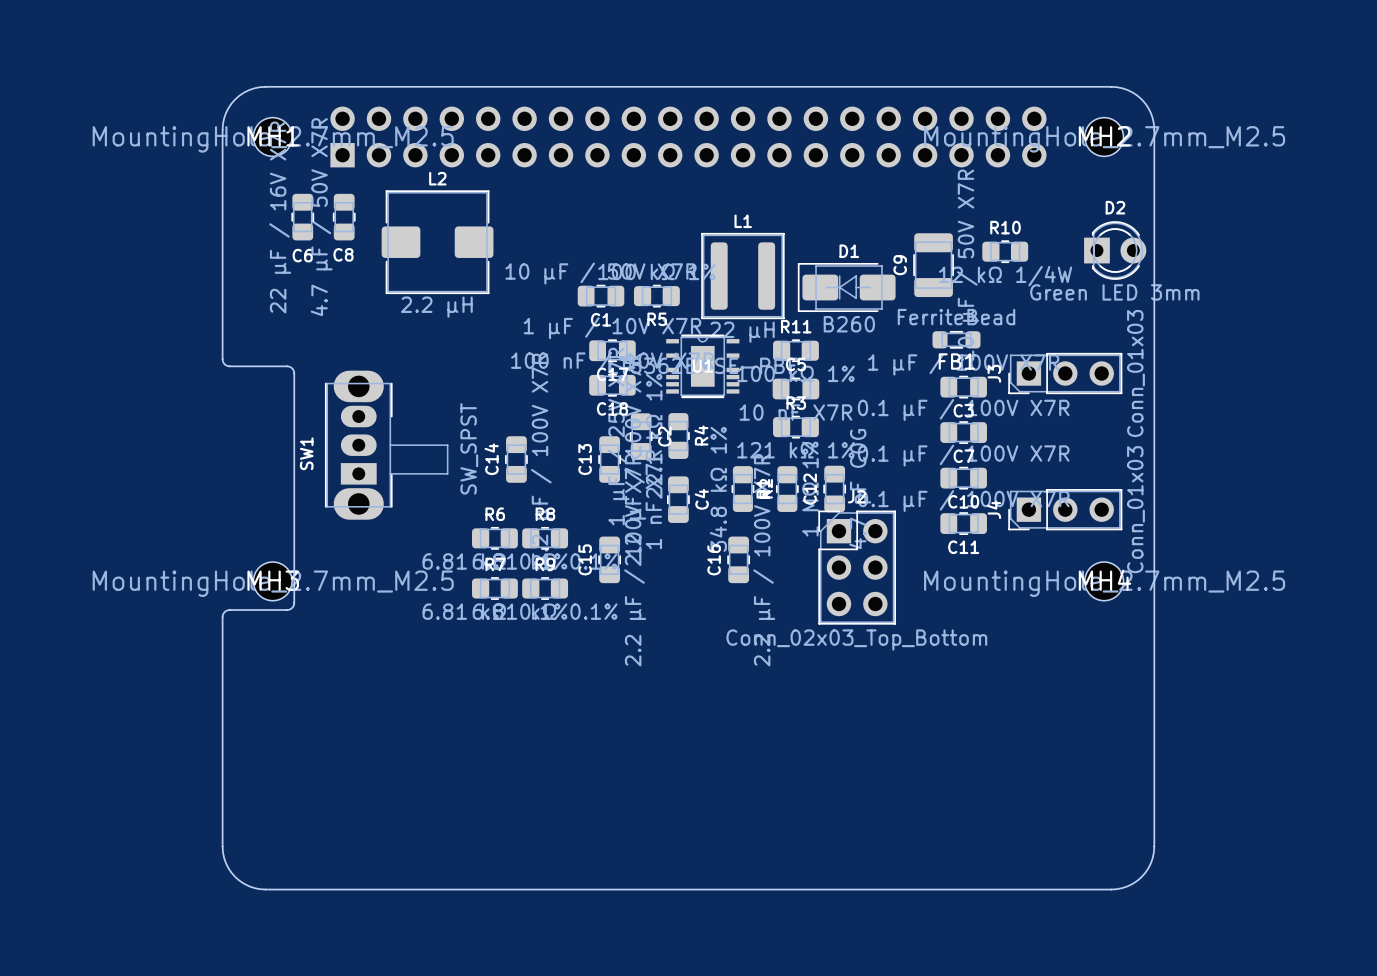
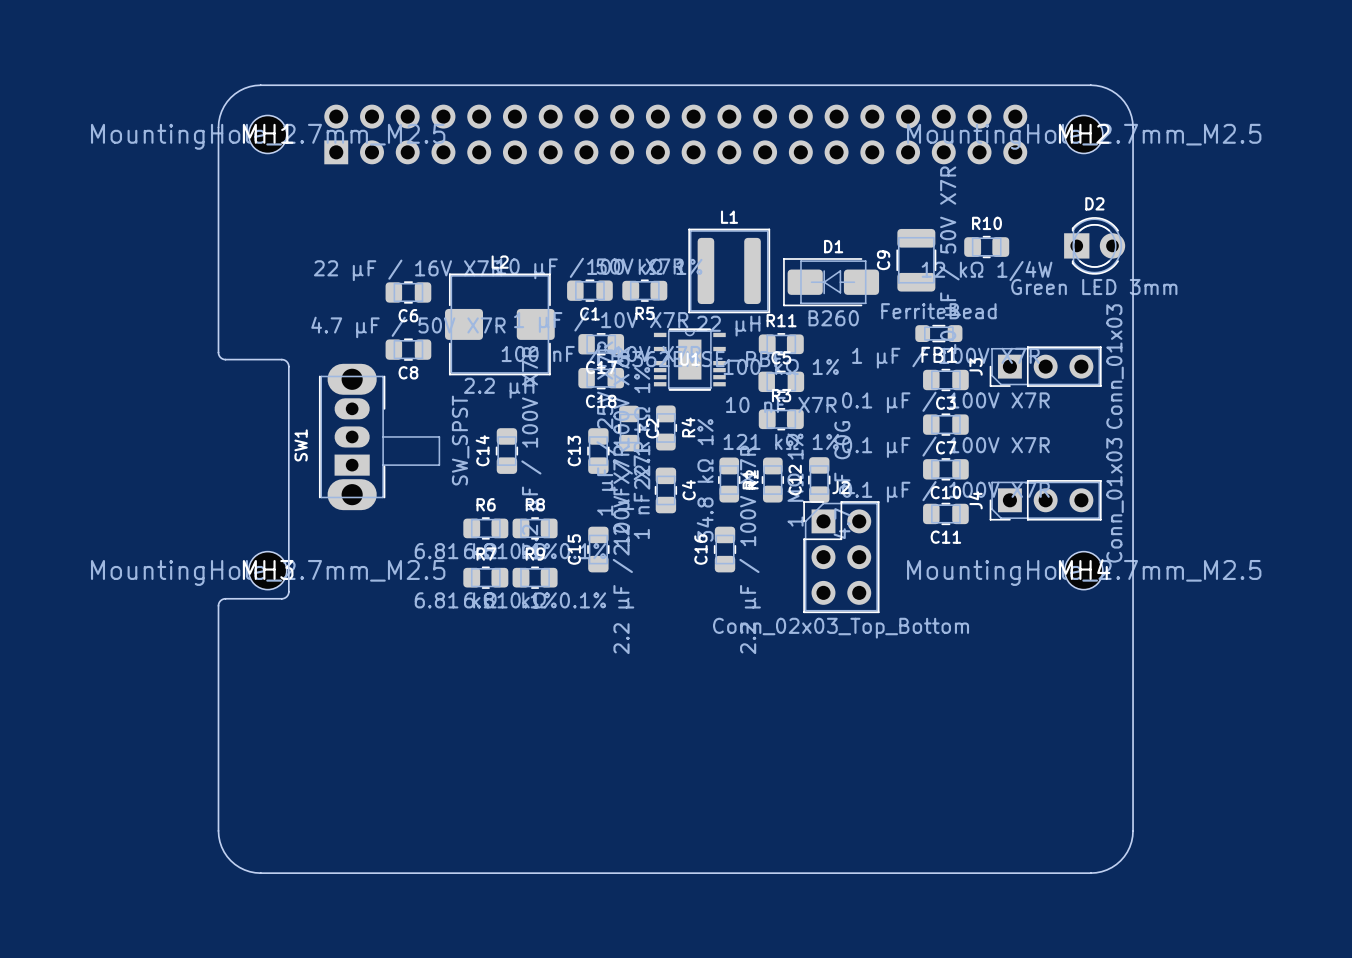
C6 rotation: 0° (302, 217) -> 90° clockwise (408, 292)
C6 position: (302, 217) -> (408, 292)
C8 rotation: 0° (344, 217) -> 90° clockwise (408, 349)
C8 position: (344, 217) -> (408, 349)
L2 position: (437, 242) -> (499, 324)

